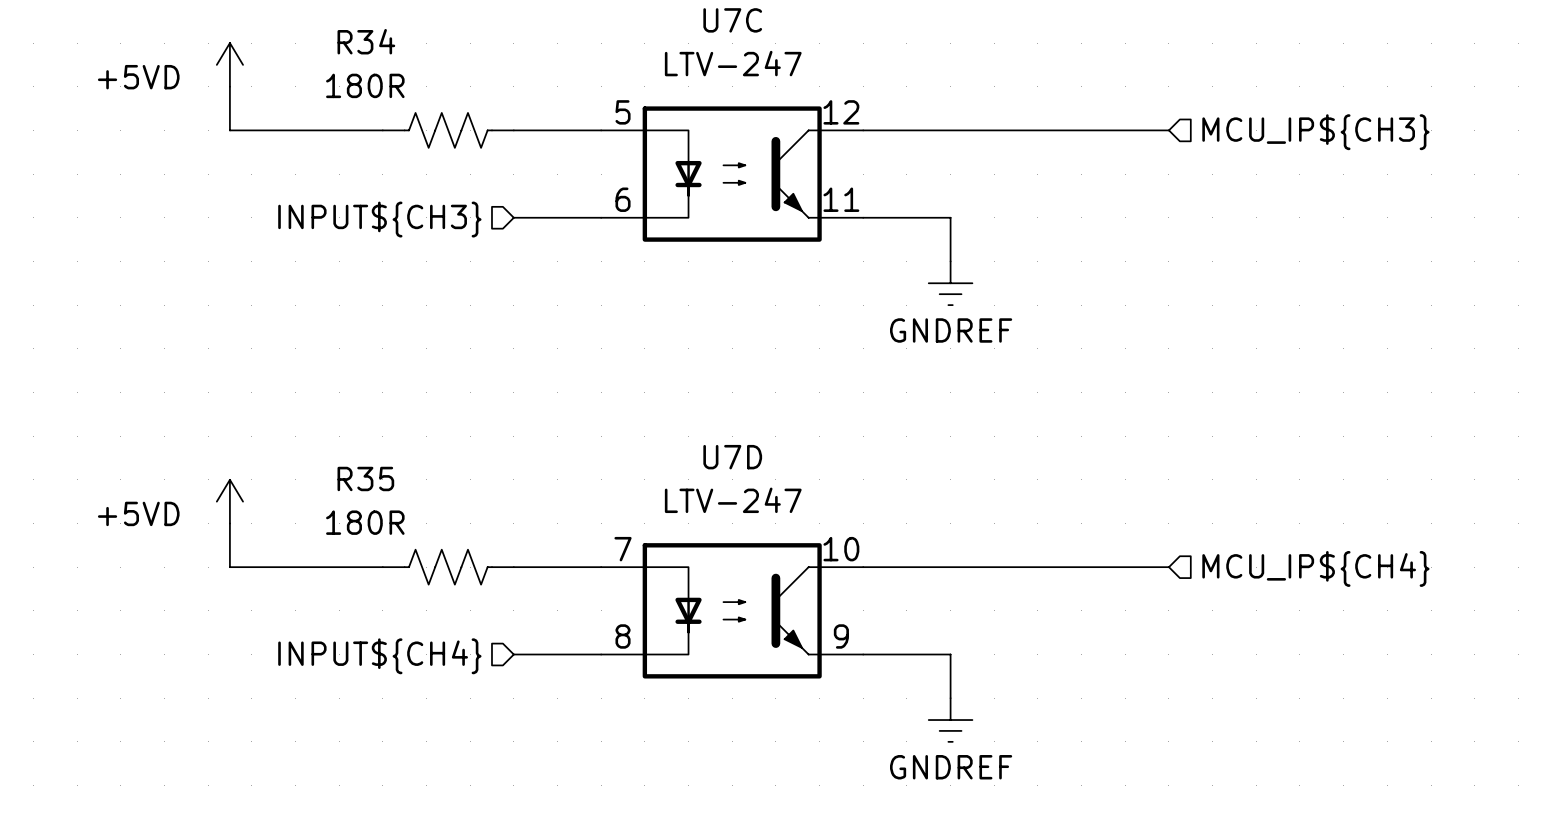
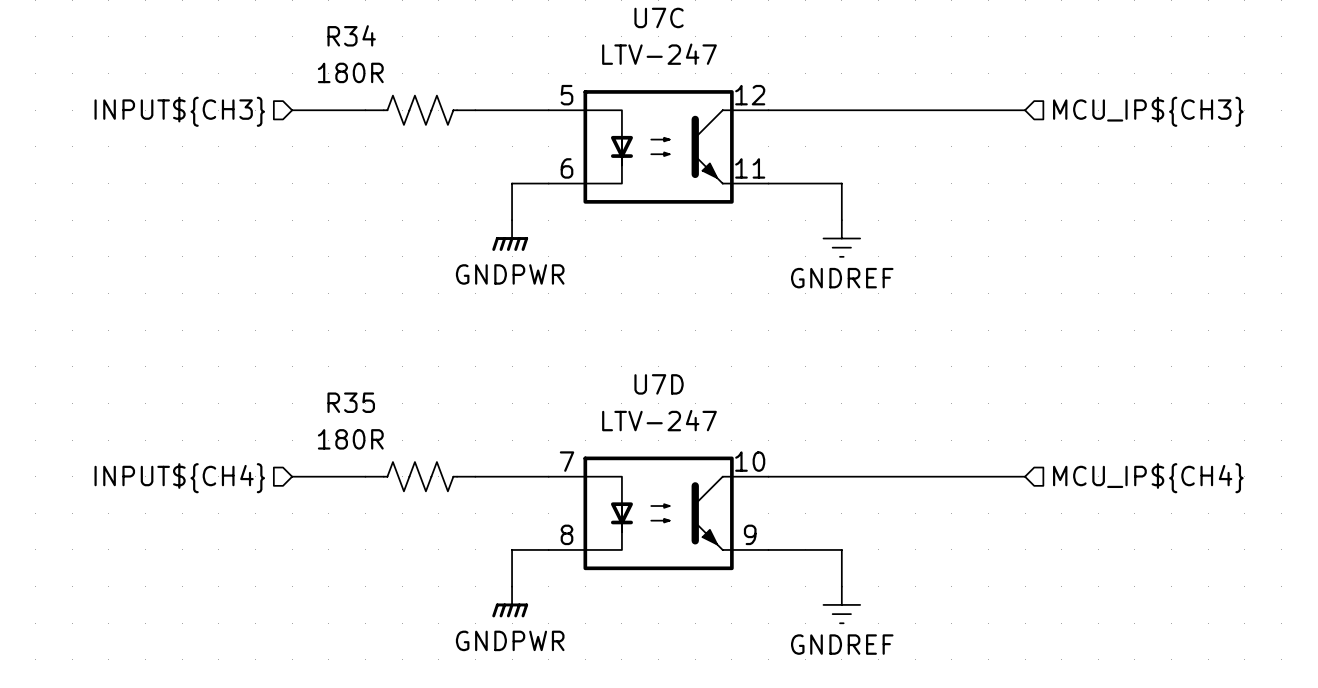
power symbol: +5VD (229, 64) -> none
wire: (229, 86) (229, 130) (295, 130) -> none
wire: (513, 217) (557, 217) -> (512, 220) (512, 183)
hierarchical label position: INPUT${CH3} (379, 219) -> INPUT${CH3} (179, 111)
power symbol: none -> GNDPWR (510, 235)
power symbol: +5VD (229, 501) -> none
wire: (229, 523) (229, 567) (295, 567) -> none
wire: (513, 654) (557, 654) -> (512, 586) (512, 549)
hierarchical label position: INPUT${CH4} (379, 656) -> INPUT${CH4} (179, 478)
power symbol: none -> GNDPWR (510, 602)

